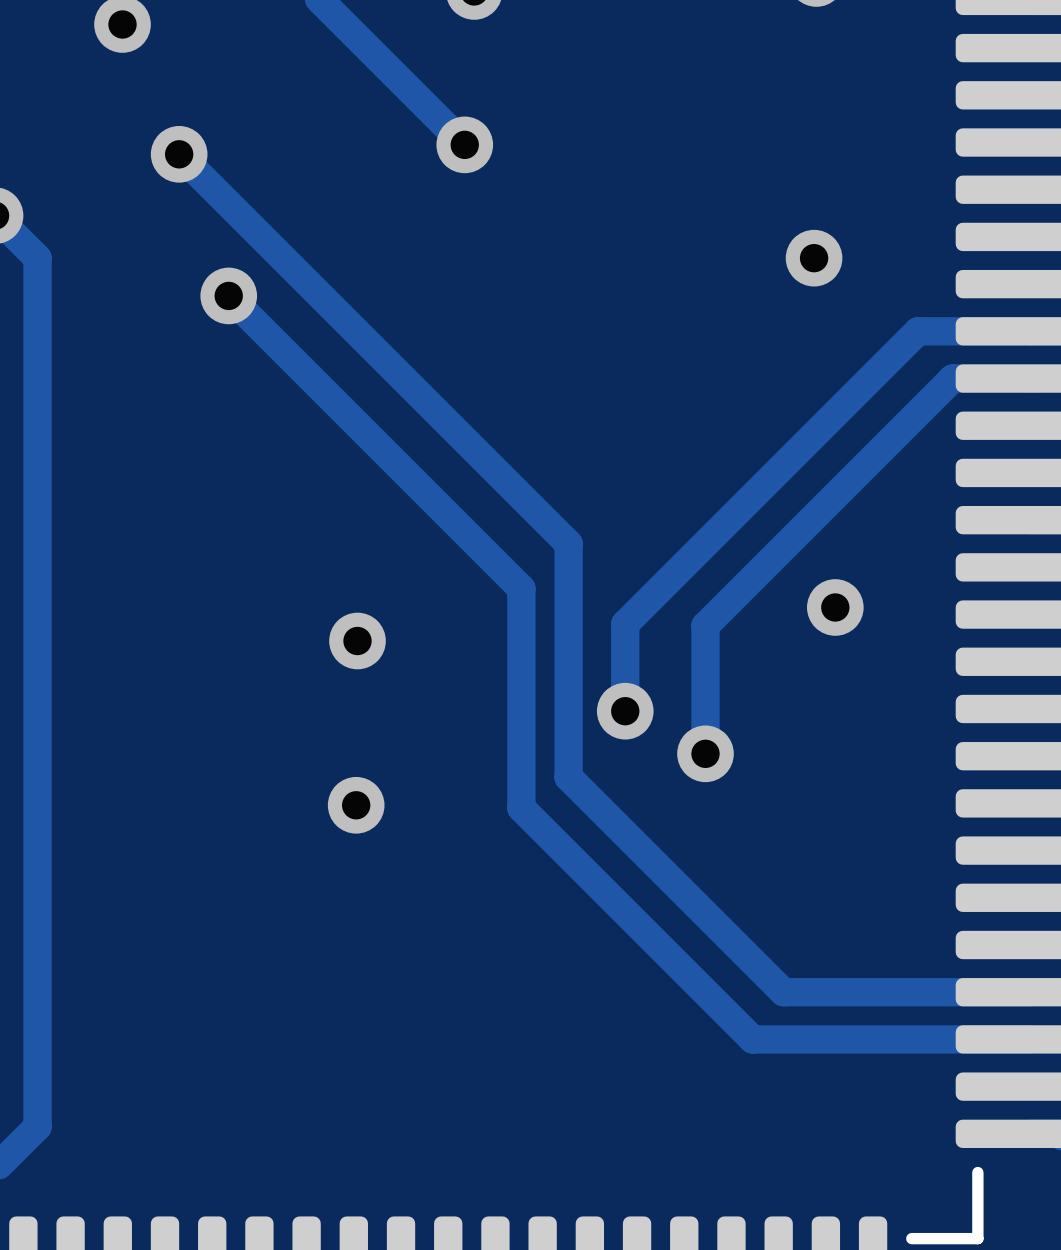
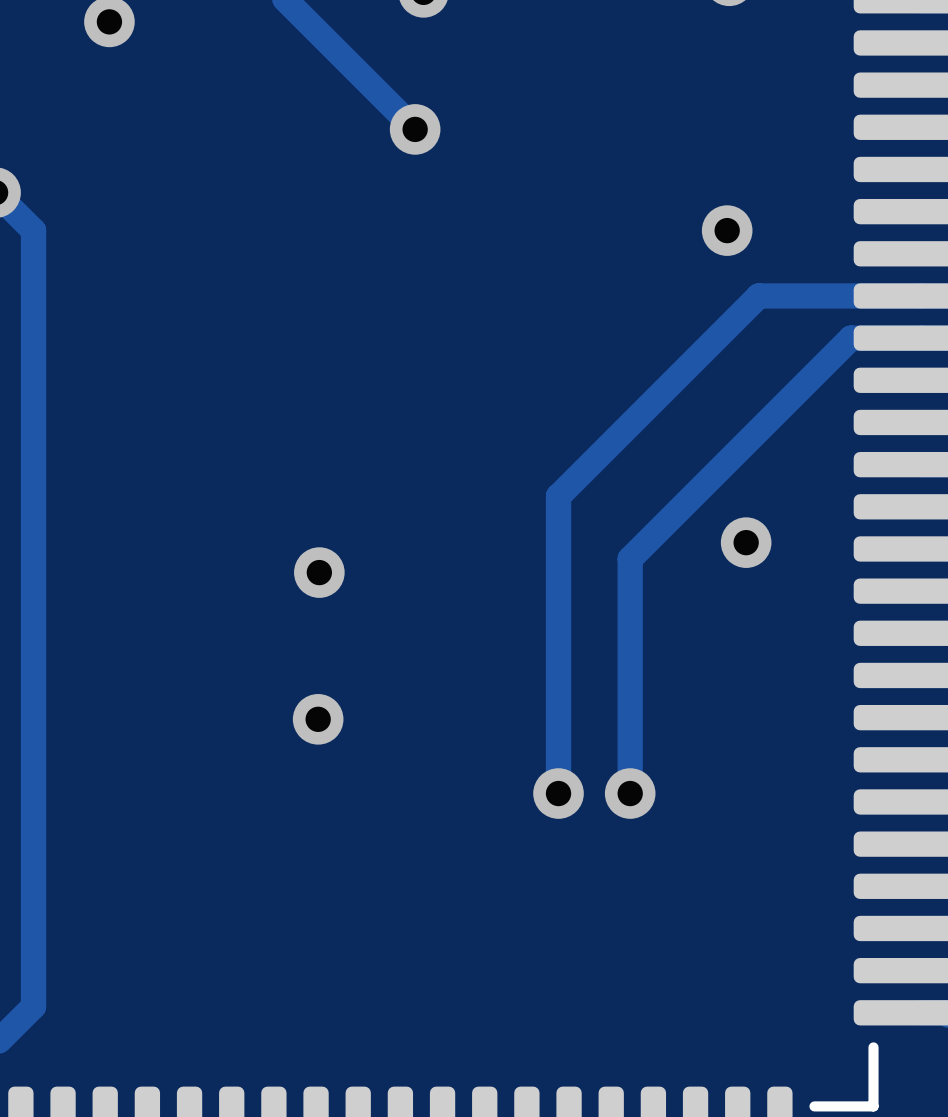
track: (179, 154) (568, 543) (568, 777) (783, 992) (1031, 992) -> none
via: (179, 154) -> none
track: (228, 295) (521, 588) (521, 808) (752, 1039) (1031, 1039) -> none
via: (228, 295) -> none
track: (917, 331) (625, 624) -> (819, 295) (758, 295) (558, 496) (558, 557)
track: none -> (558, 635) (558, 793)
via: (625, 711) -> none
track: none -> (630, 673) (630, 793)
via: (705, 753) -> none
via: none -> (558, 793)
via: none -> (630, 793)

